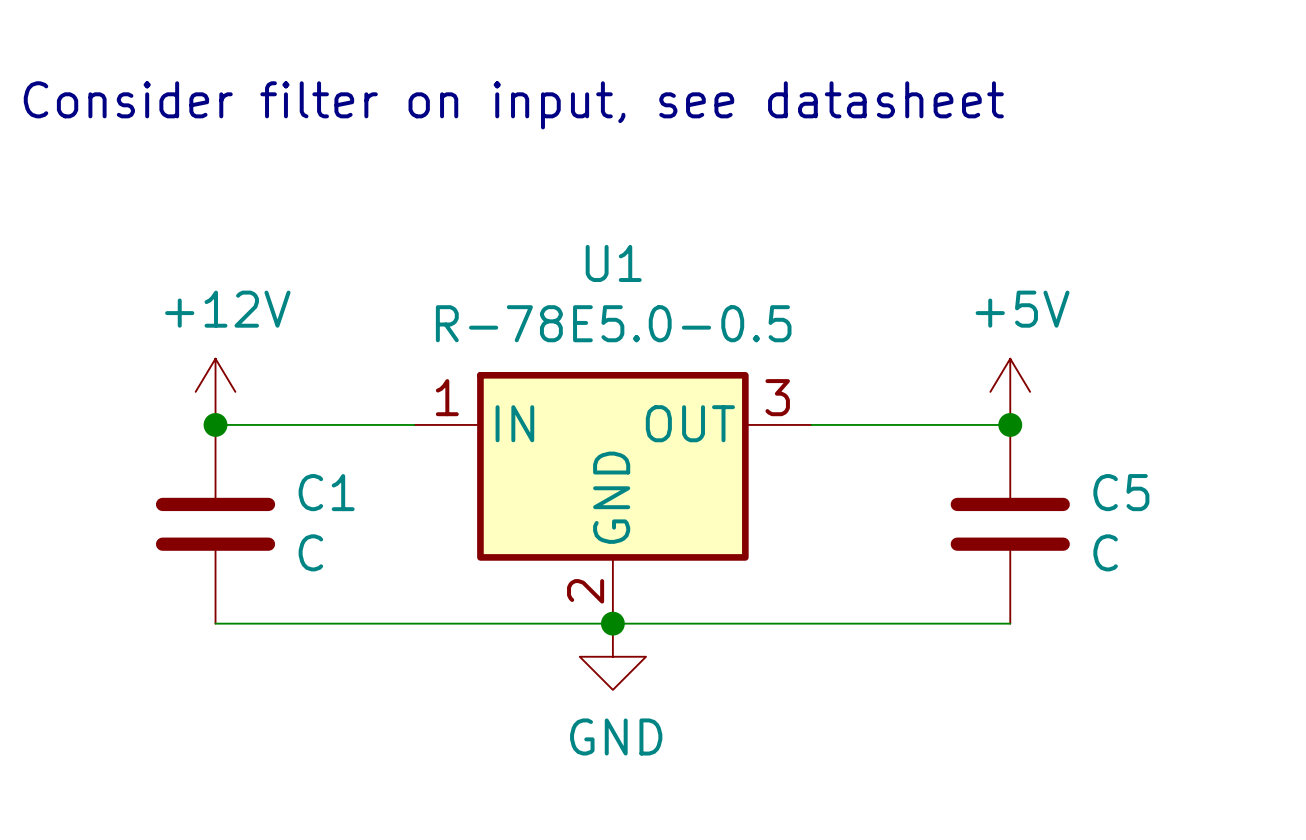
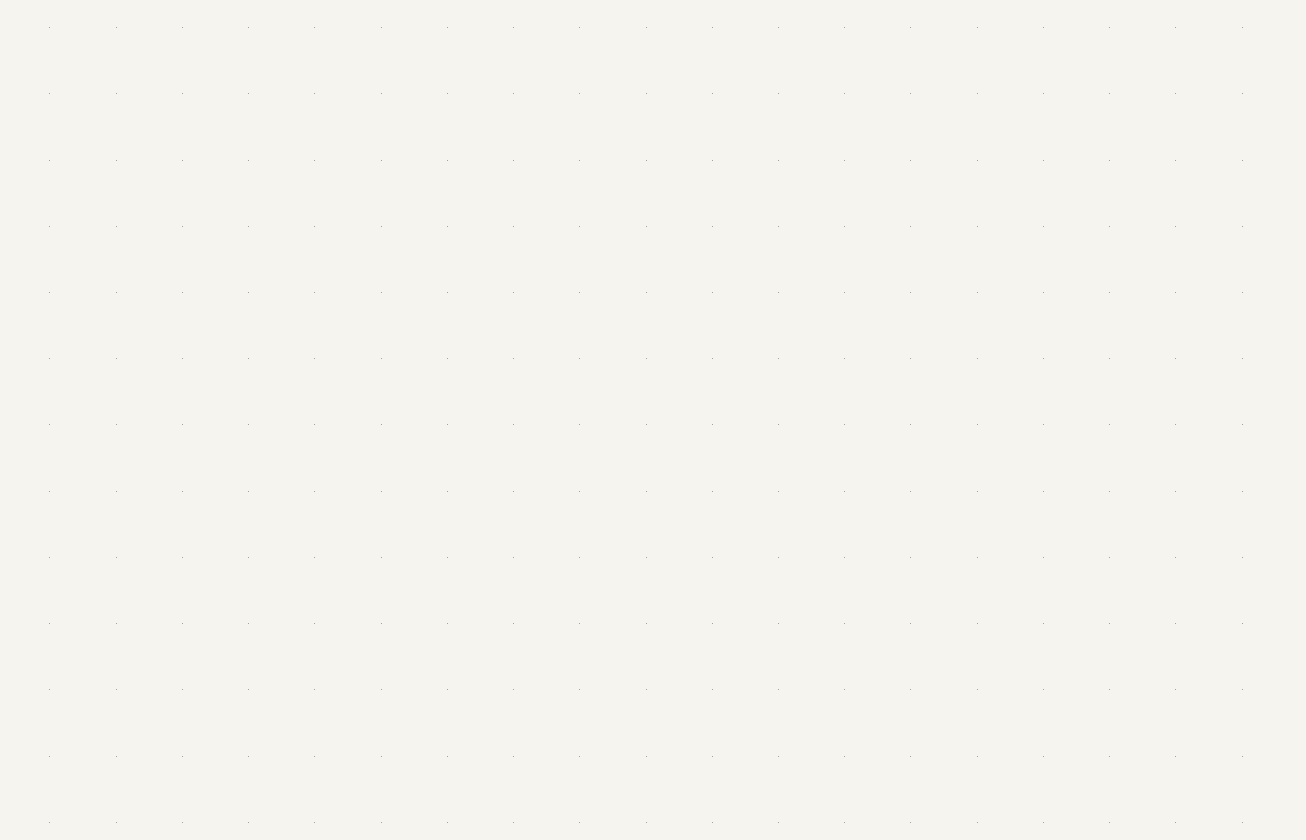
text: Consider filter on input, see datasheet (513, 105) -> none
power symbol: +12V (215, 391) -> none
power symbol: +5V (1010, 391) -> none
wire: (215, 424) (414, 424) -> none
junction: (215, 424) -> none
wire: (811, 424) (1010, 424) -> none
junction: (1010, 424) -> none
U1: R-78E5.0-0.5 (612, 497) -> none
C1: C (215, 524) -> none
C5: C (1010, 524) -> none
wire: (215, 623) (1010, 623) -> none
junction: (612, 623) -> none
power symbol: GND (612, 656) -> none

